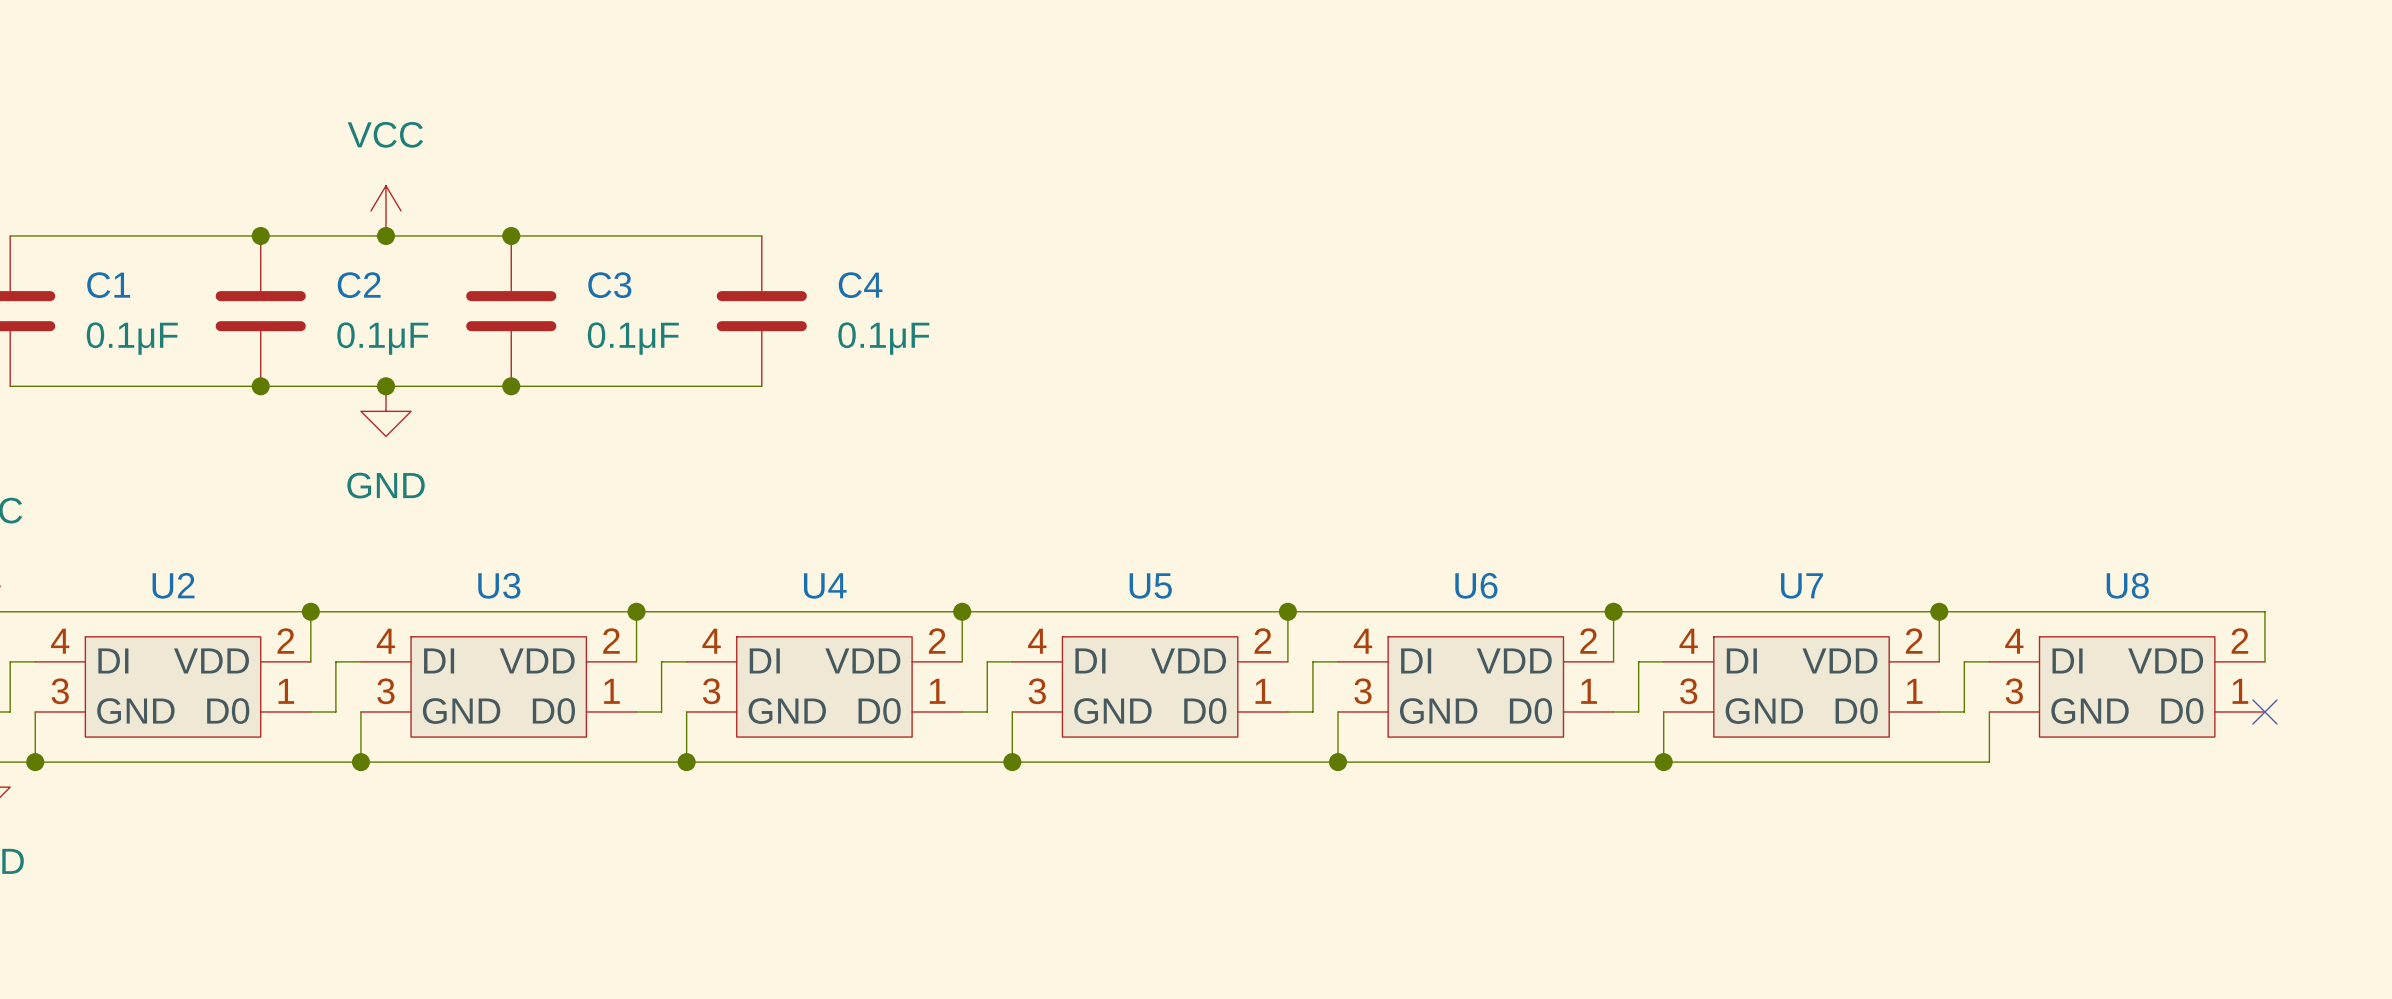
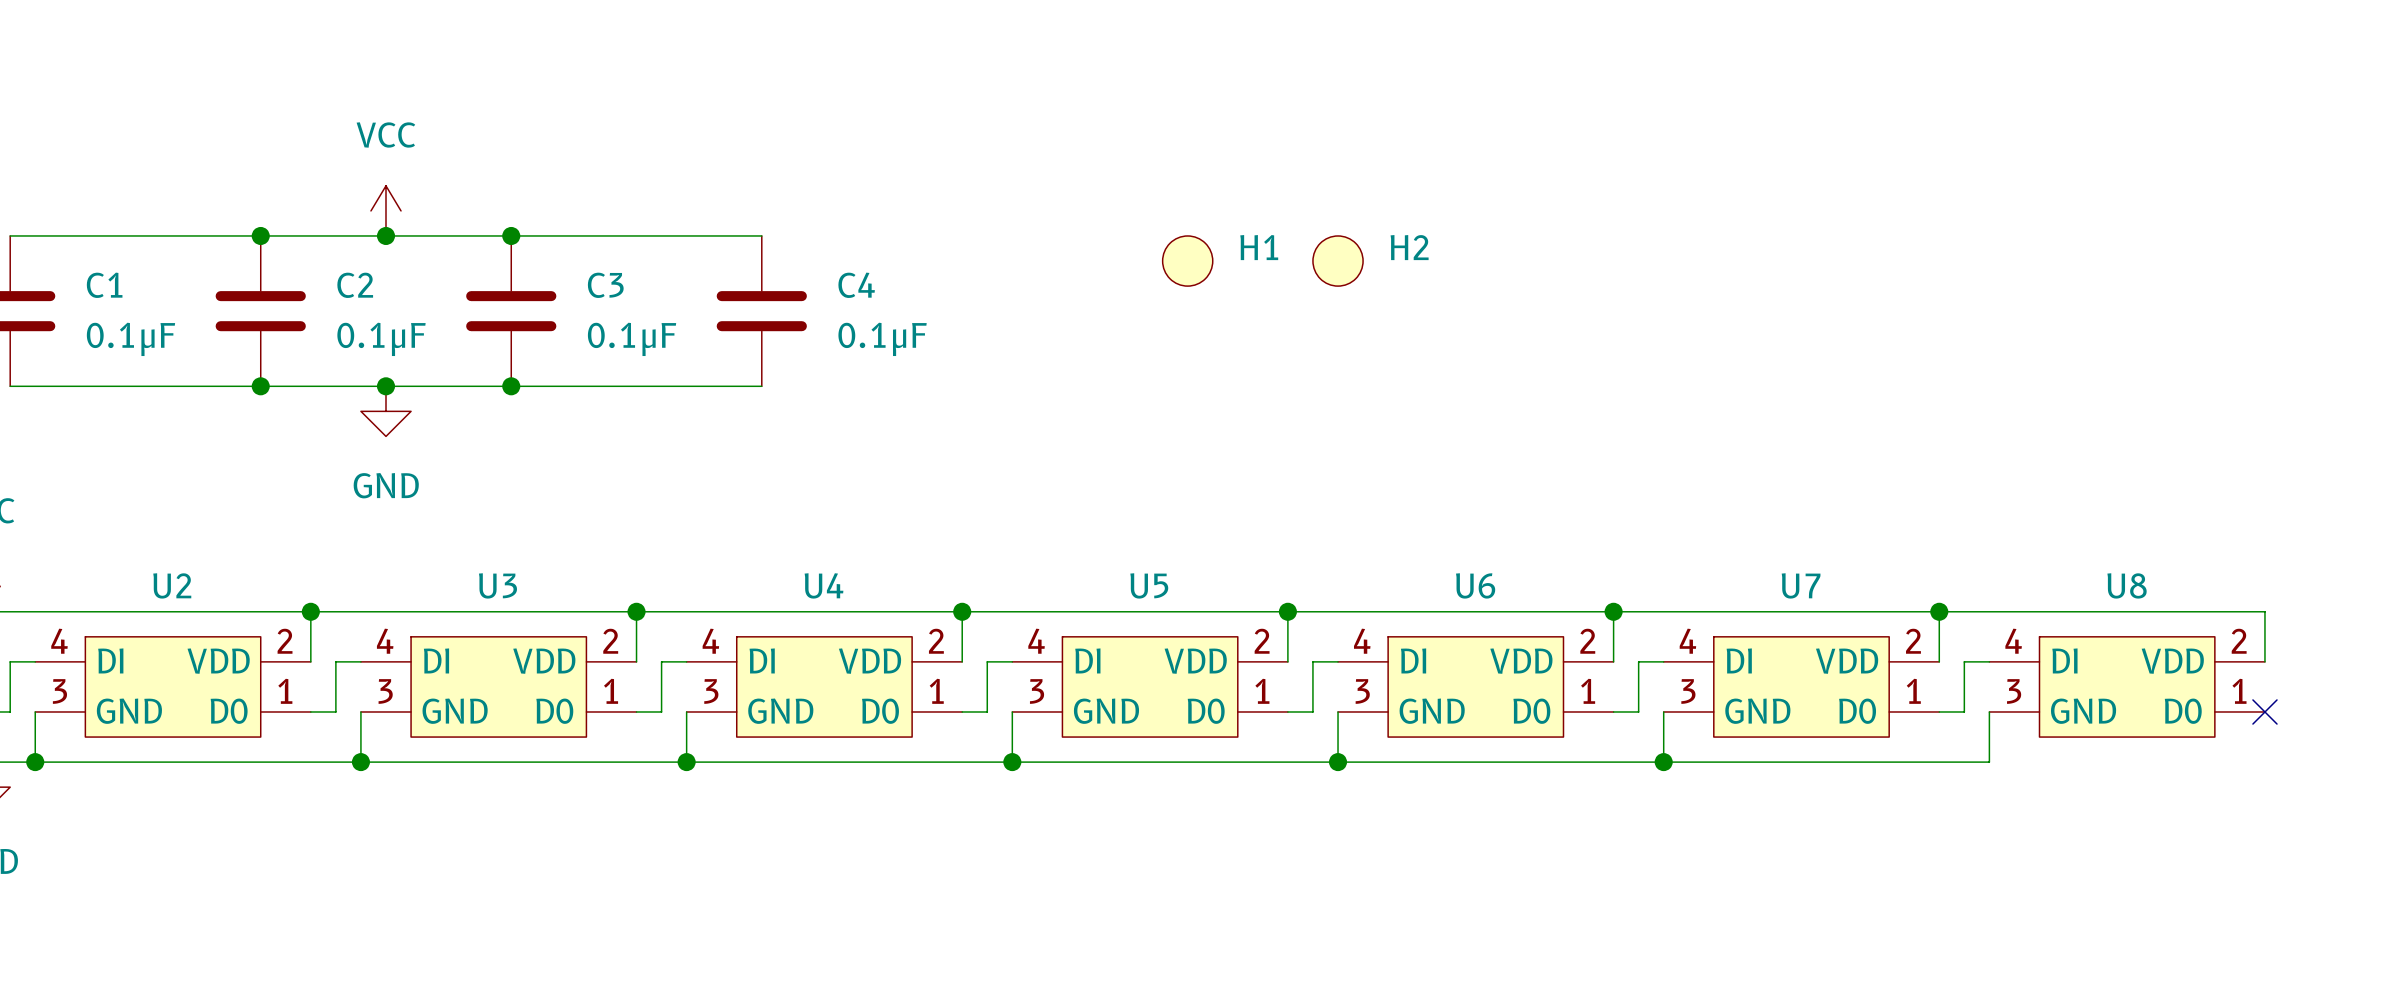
H1: none -> (1187, 261)
H2: none -> (1338, 261)

